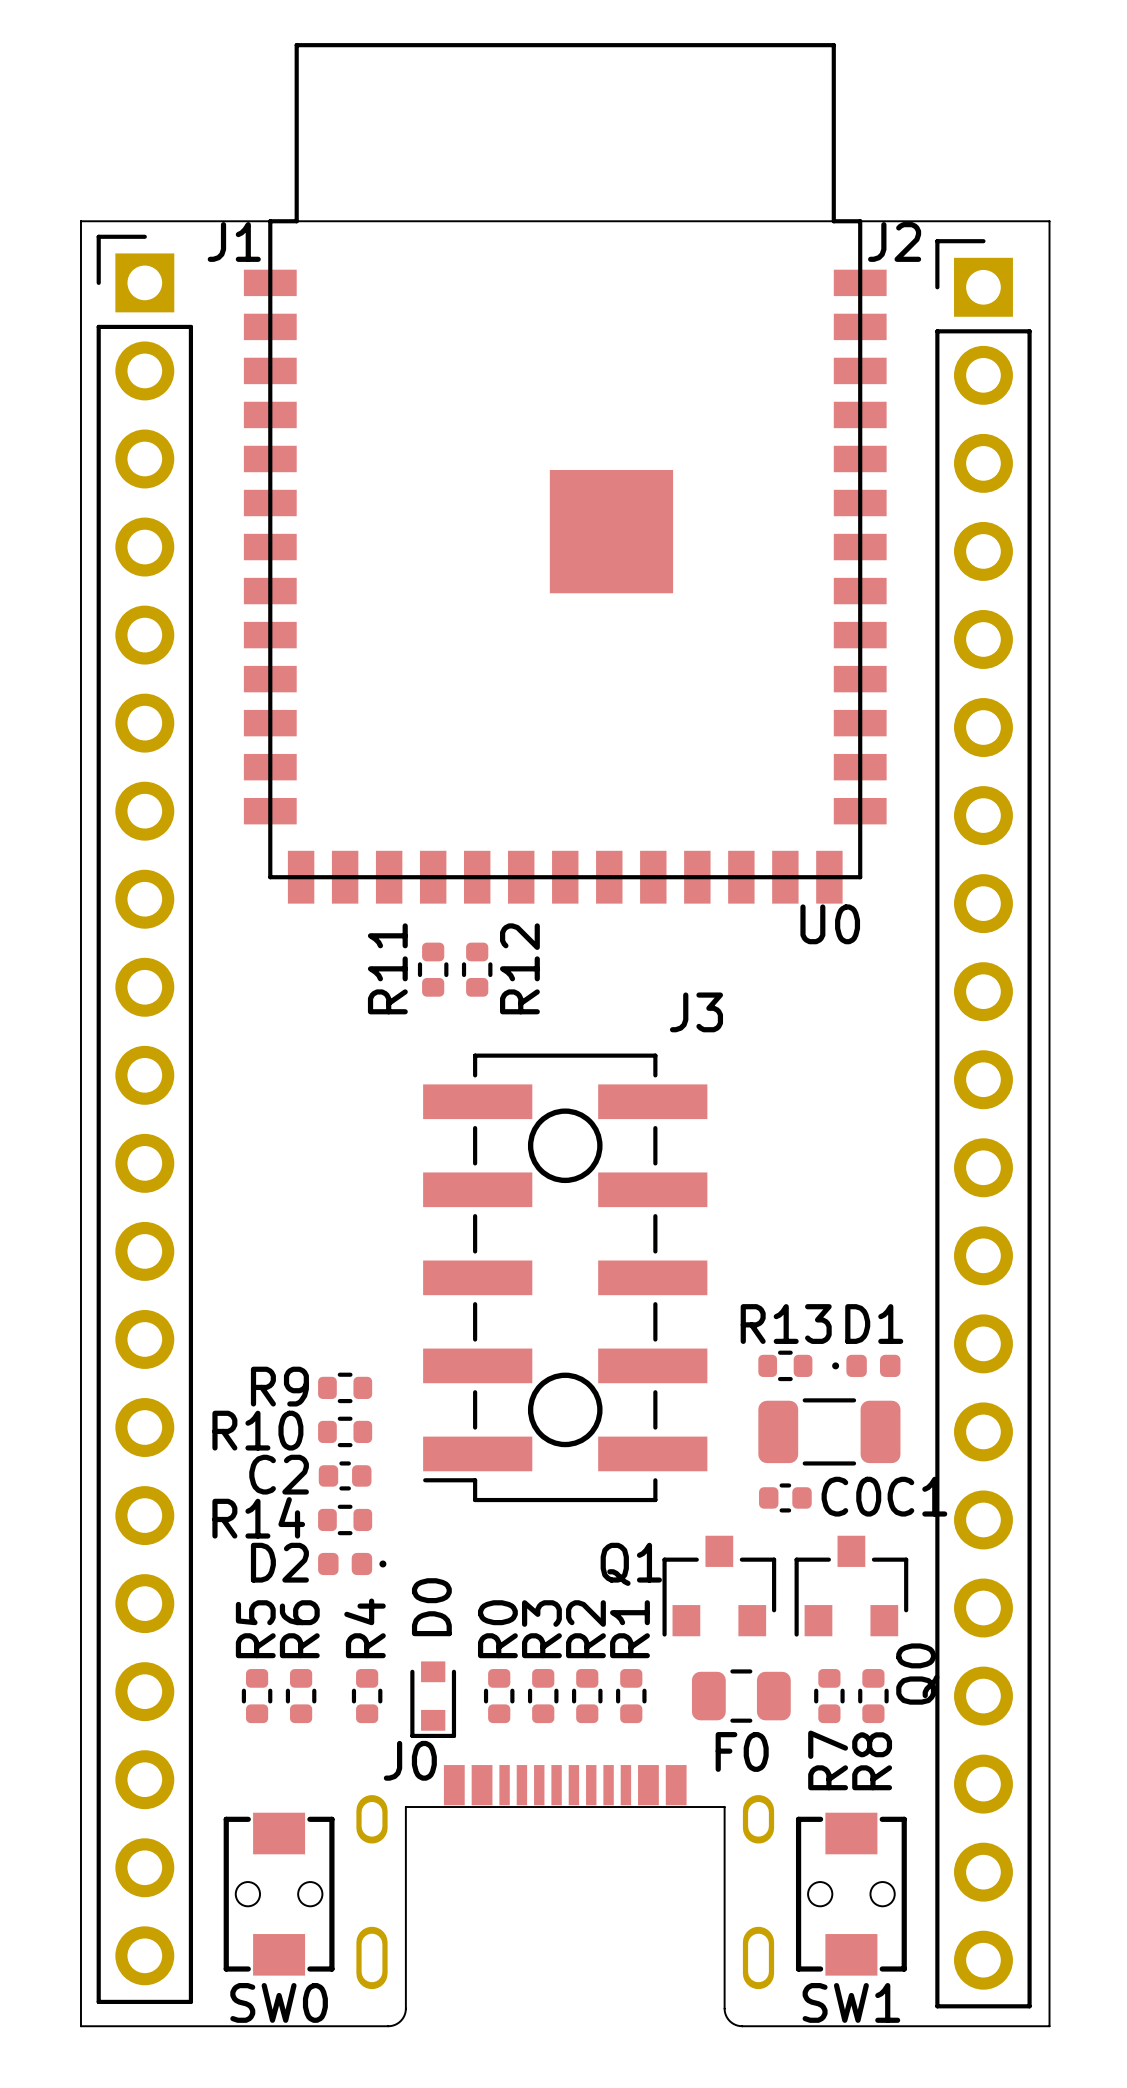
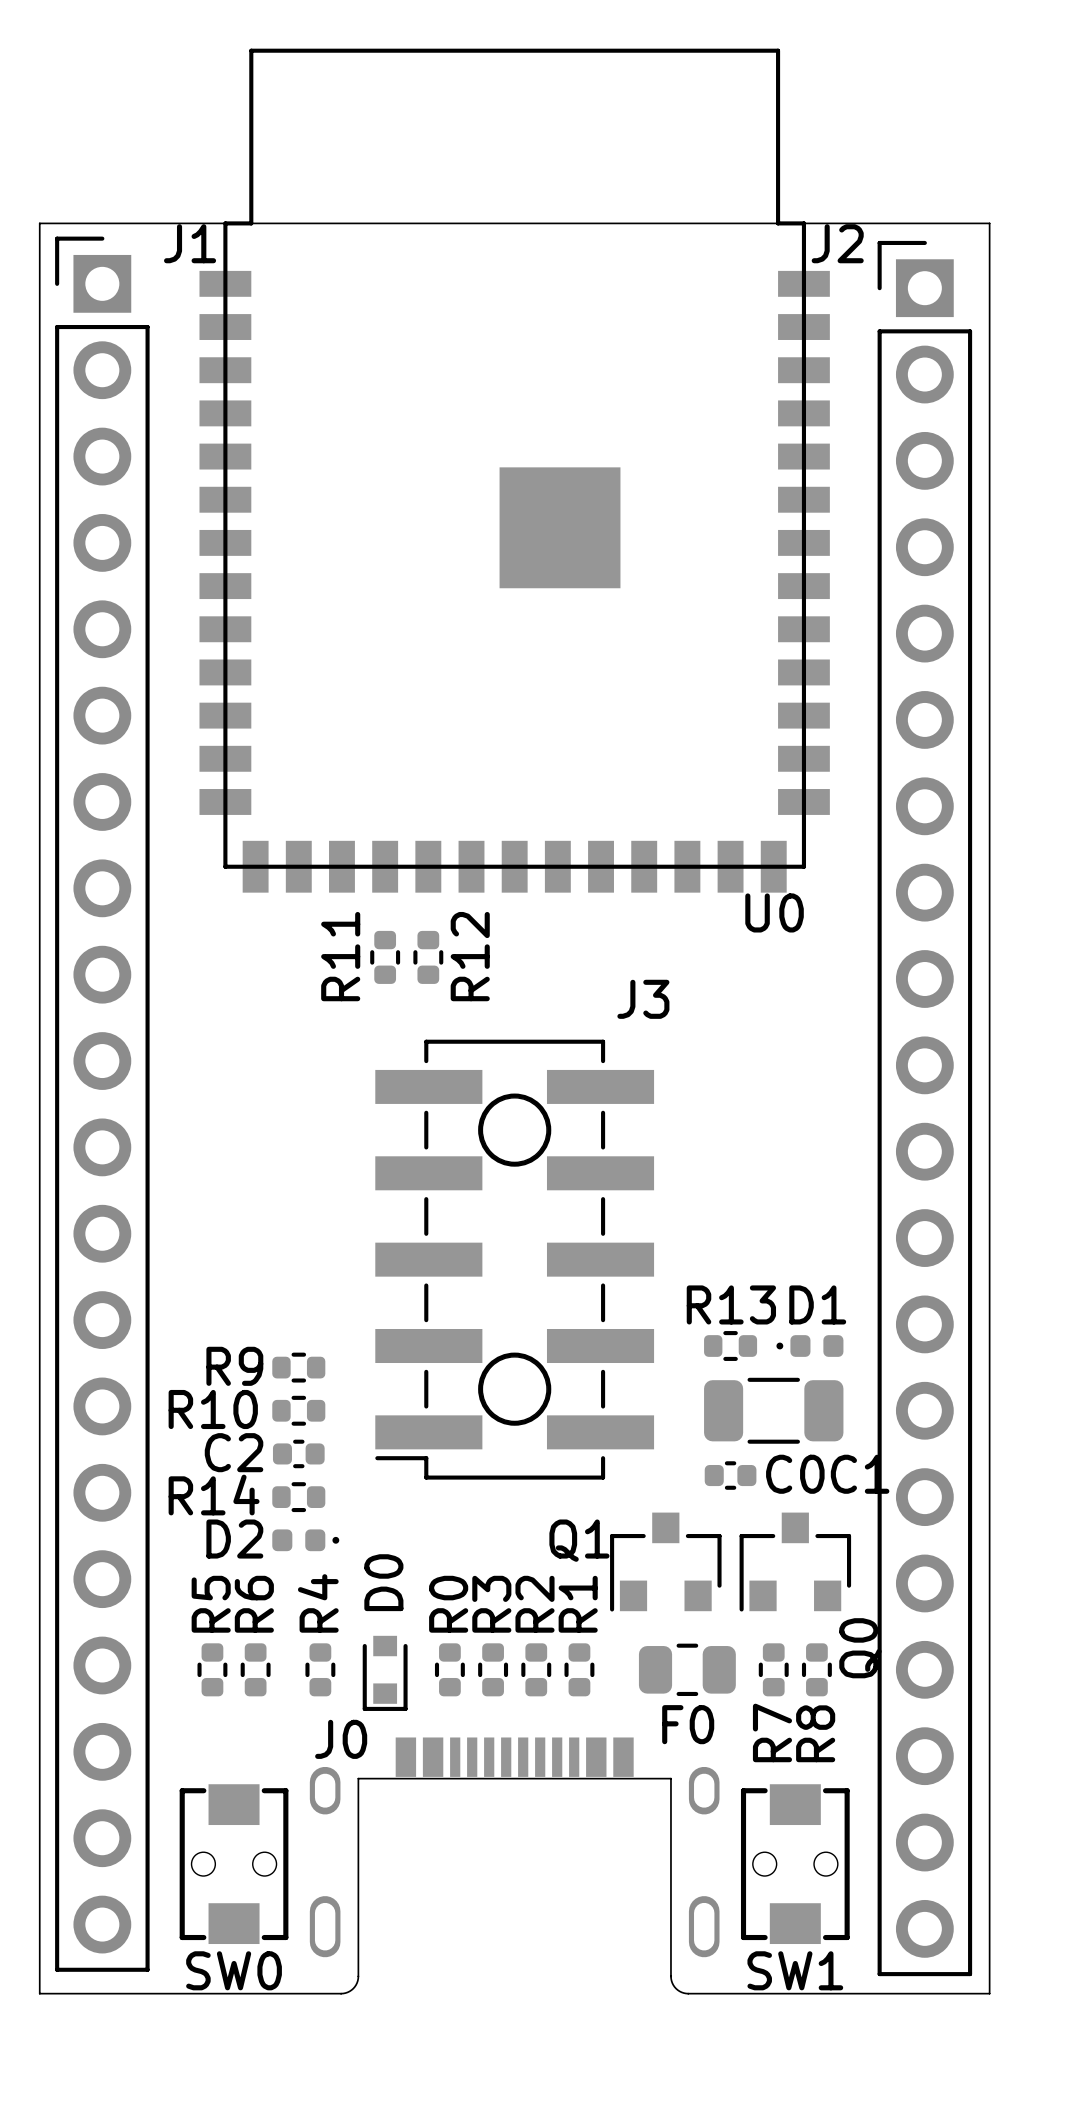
J0 name position: J0 (410, 1760) -> J0 (341, 1739)

